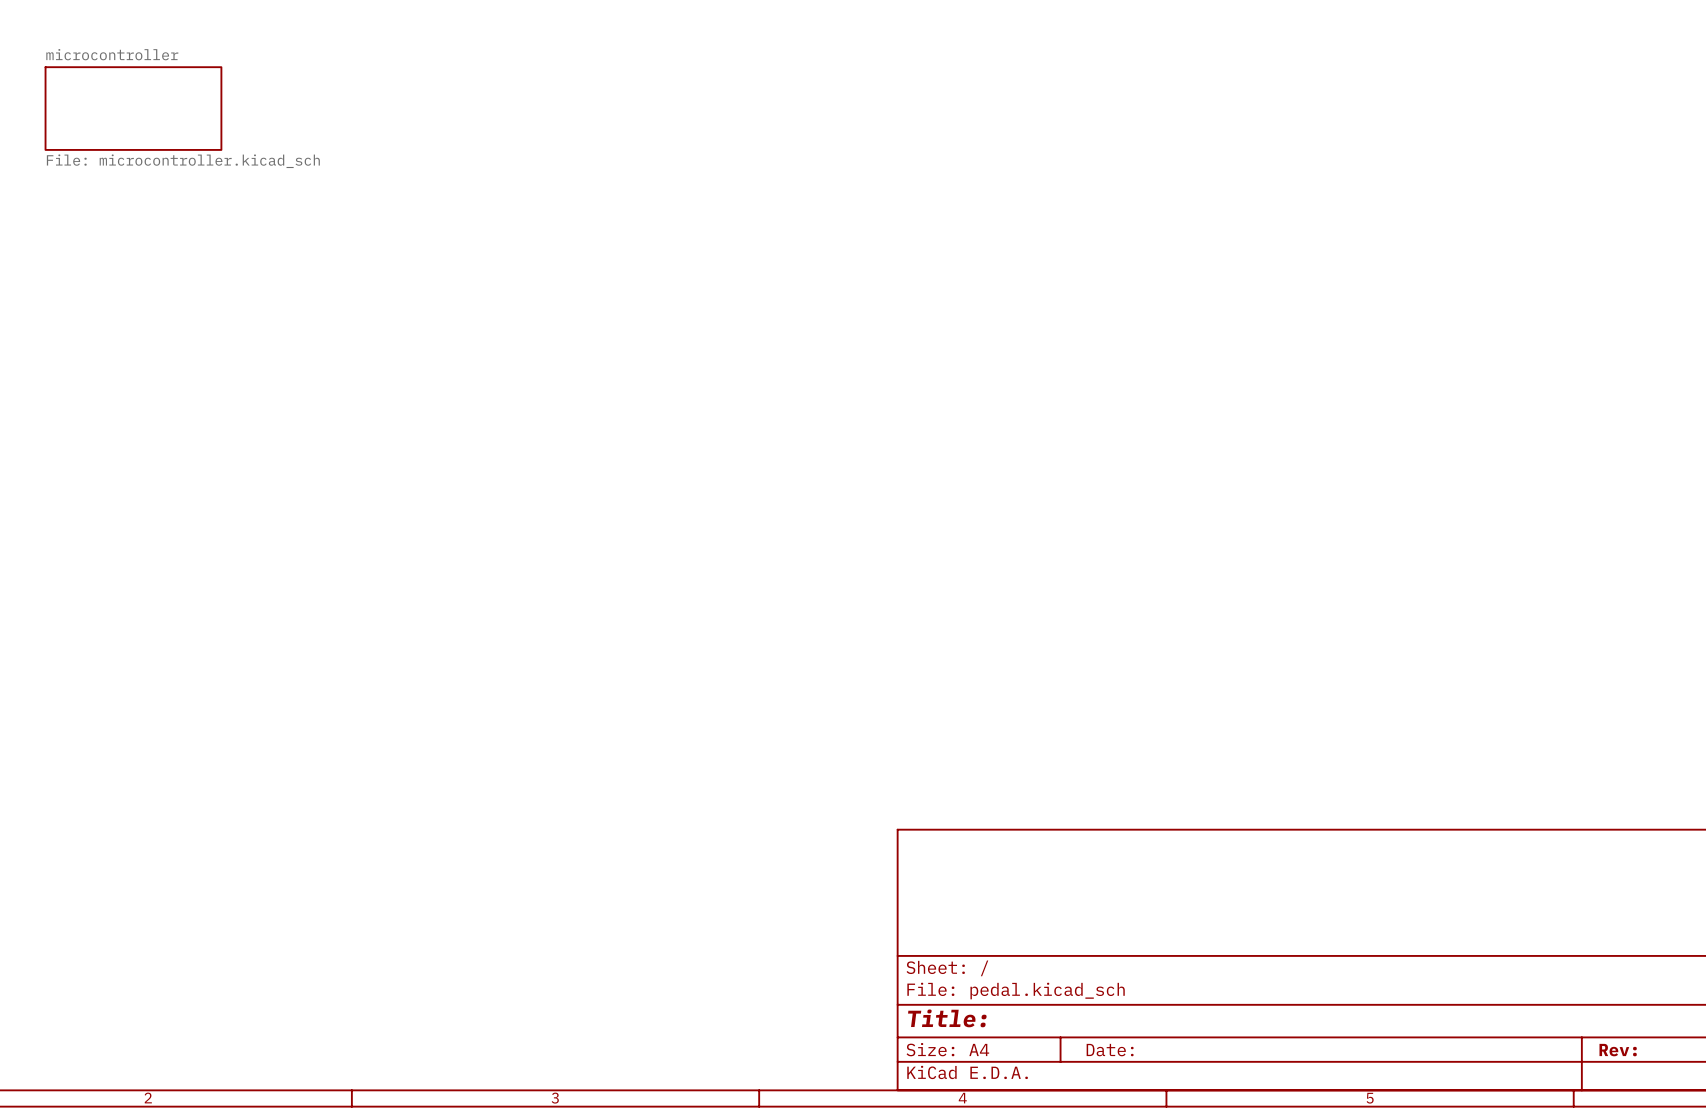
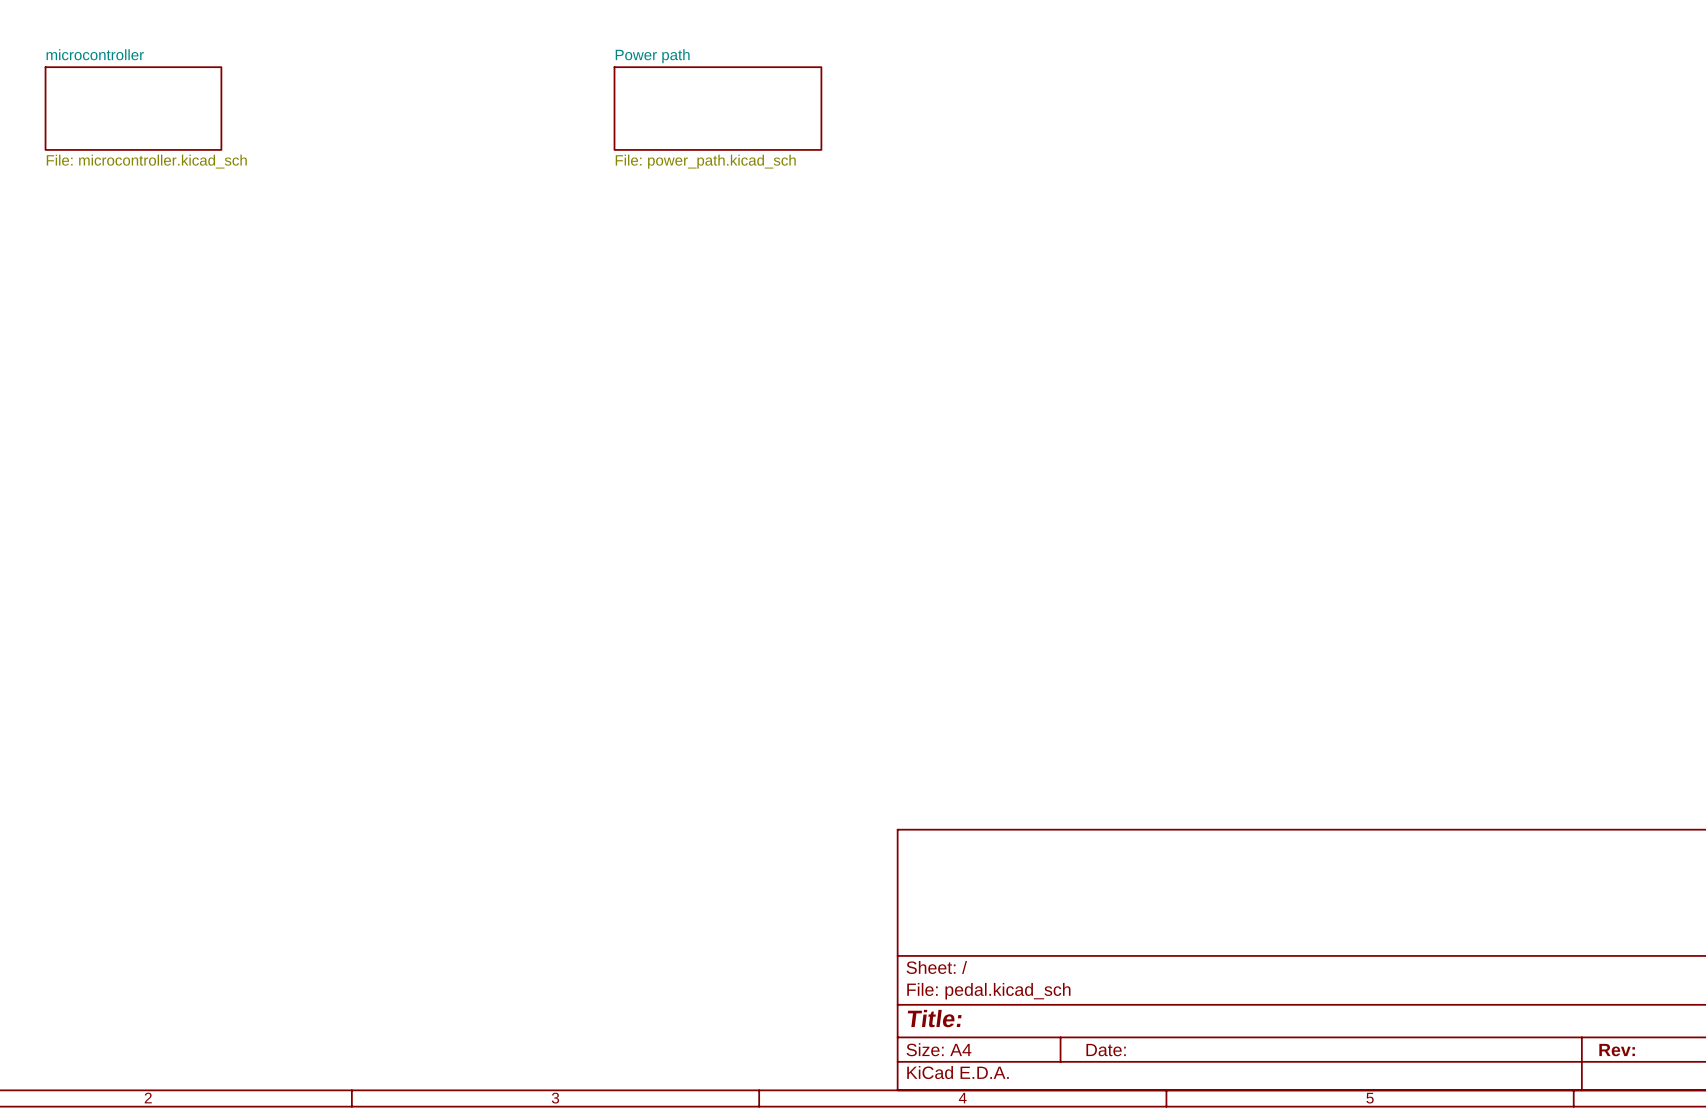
sheet Power path: none -> File: power_path.kicad_sch (717, 108)

